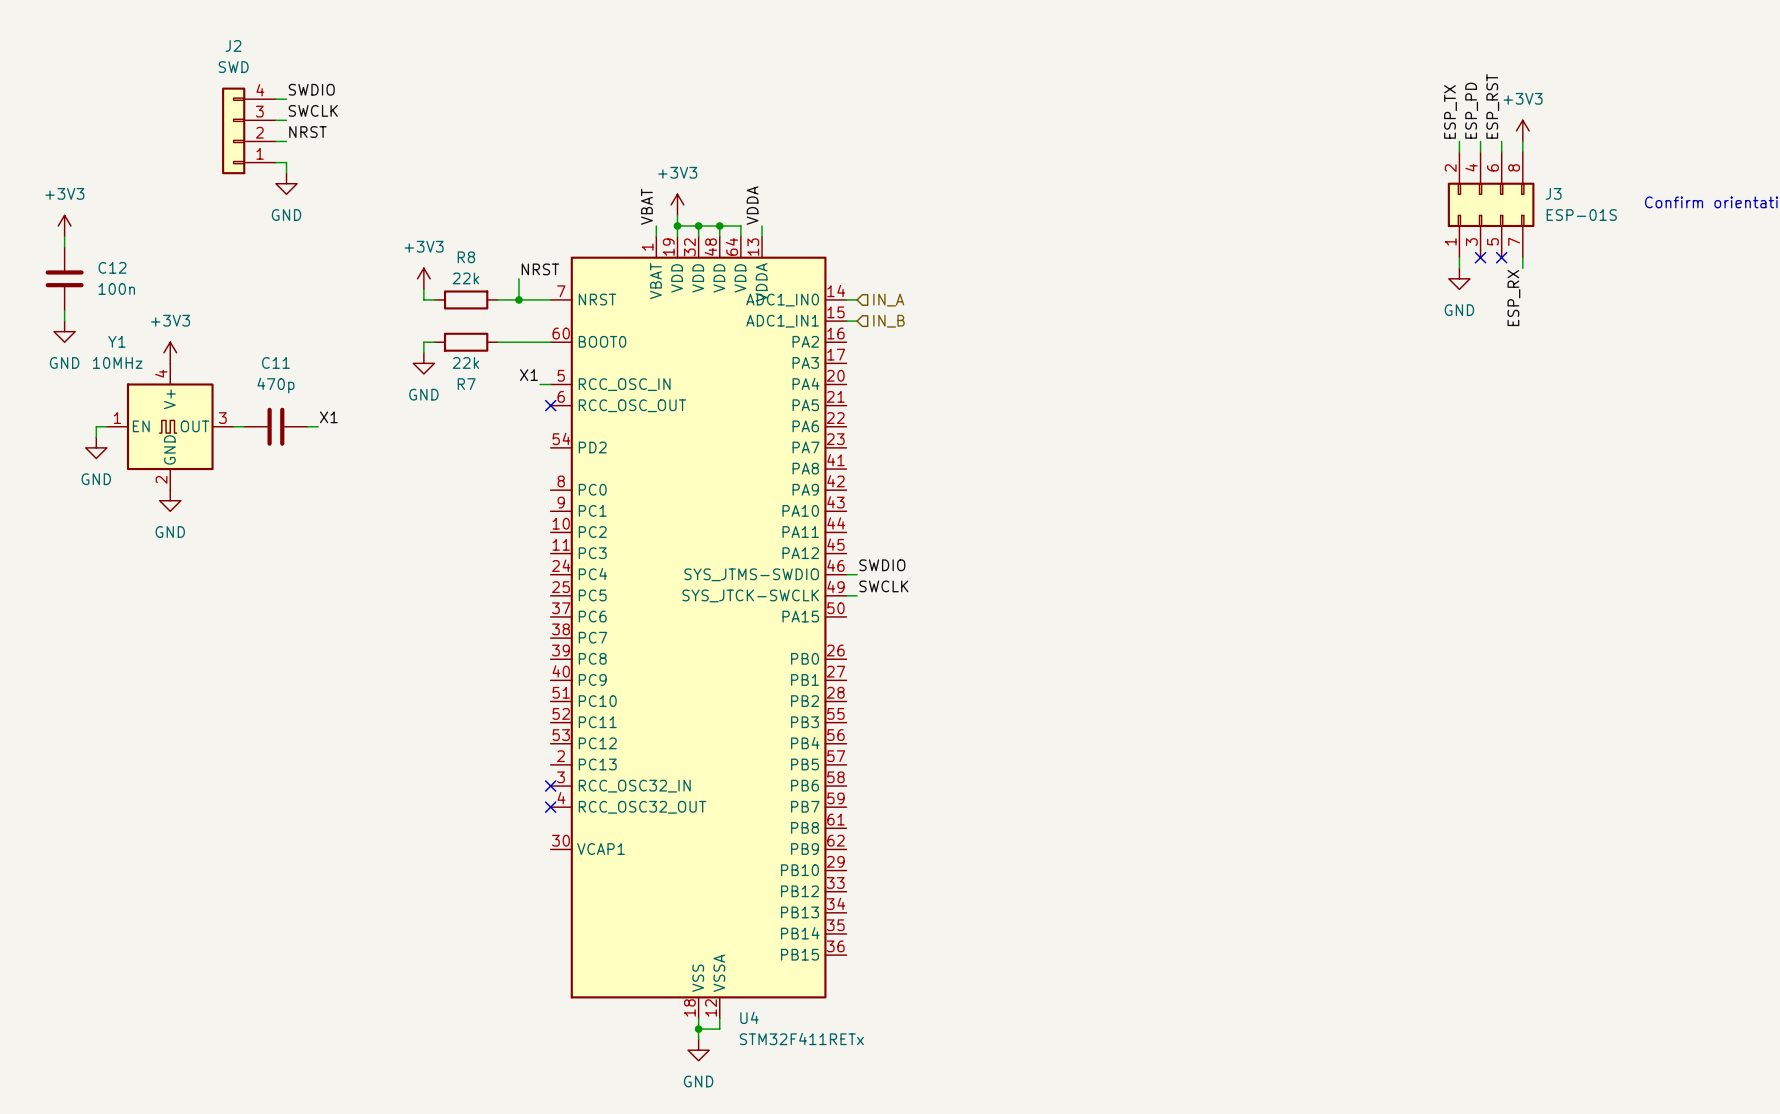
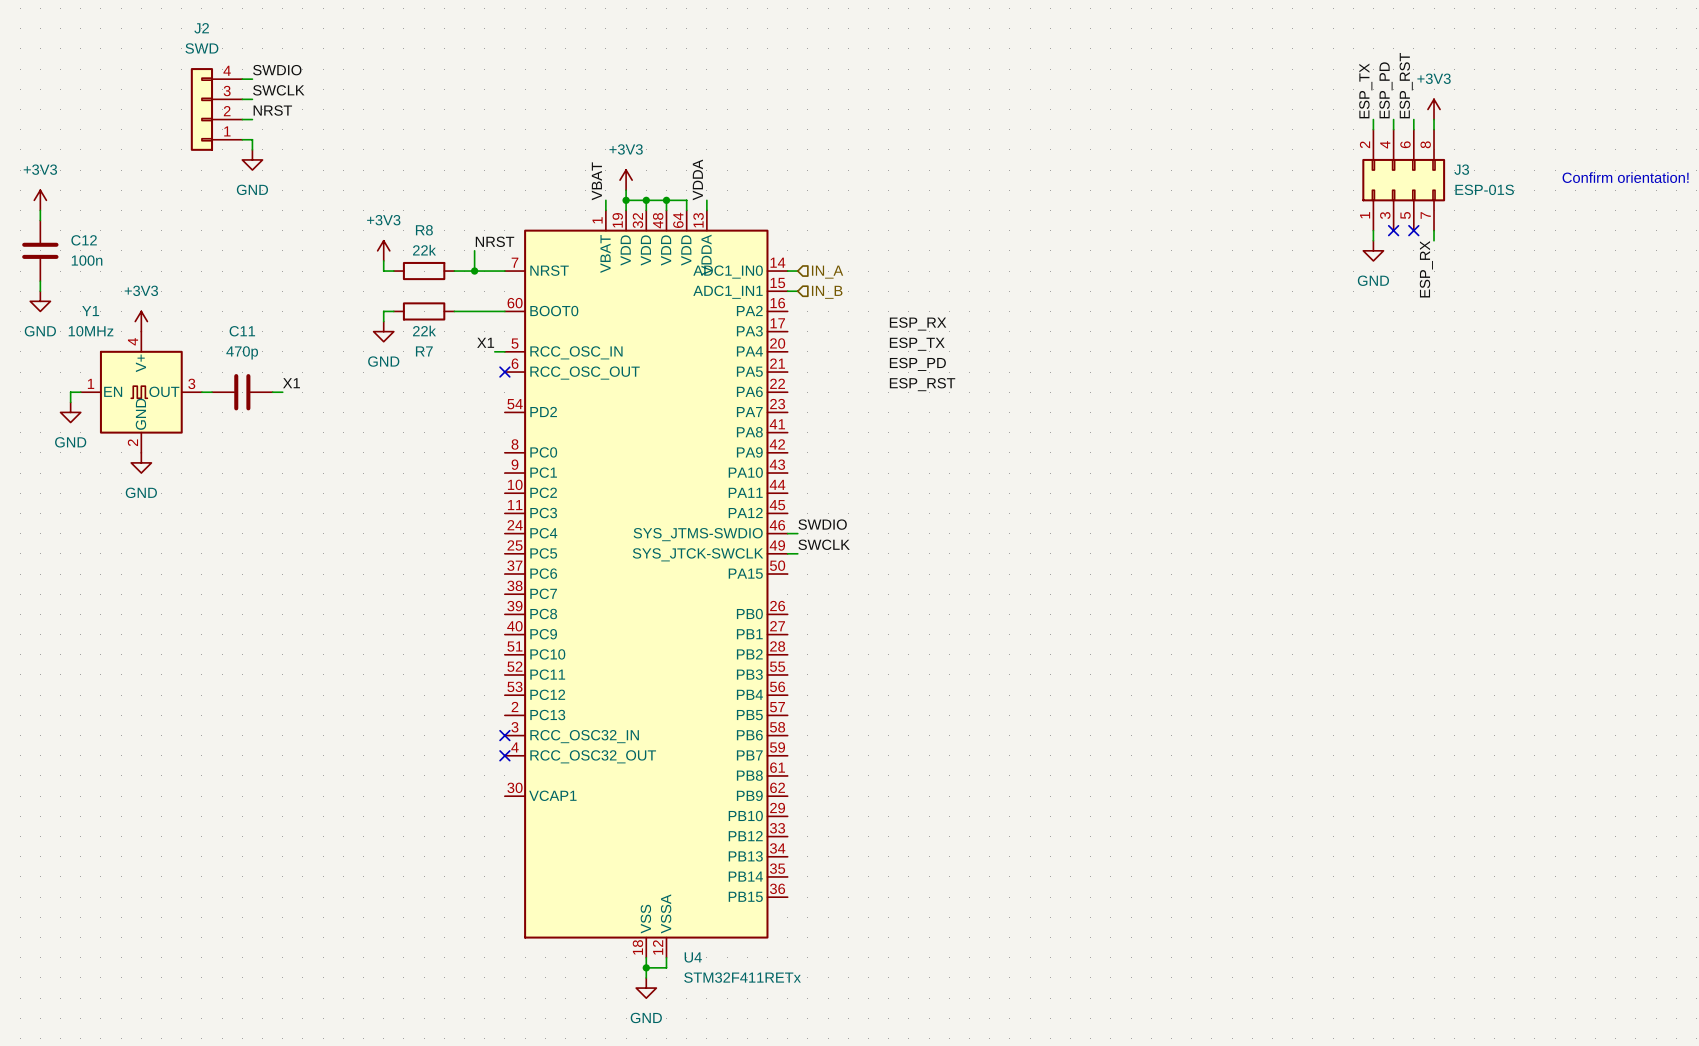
label: none -> ESP_RX (918, 324)
label: none -> ESP_TX (917, 344)
label: none -> ESP_PD (917, 364)
label: none -> ESP_RST (922, 384)

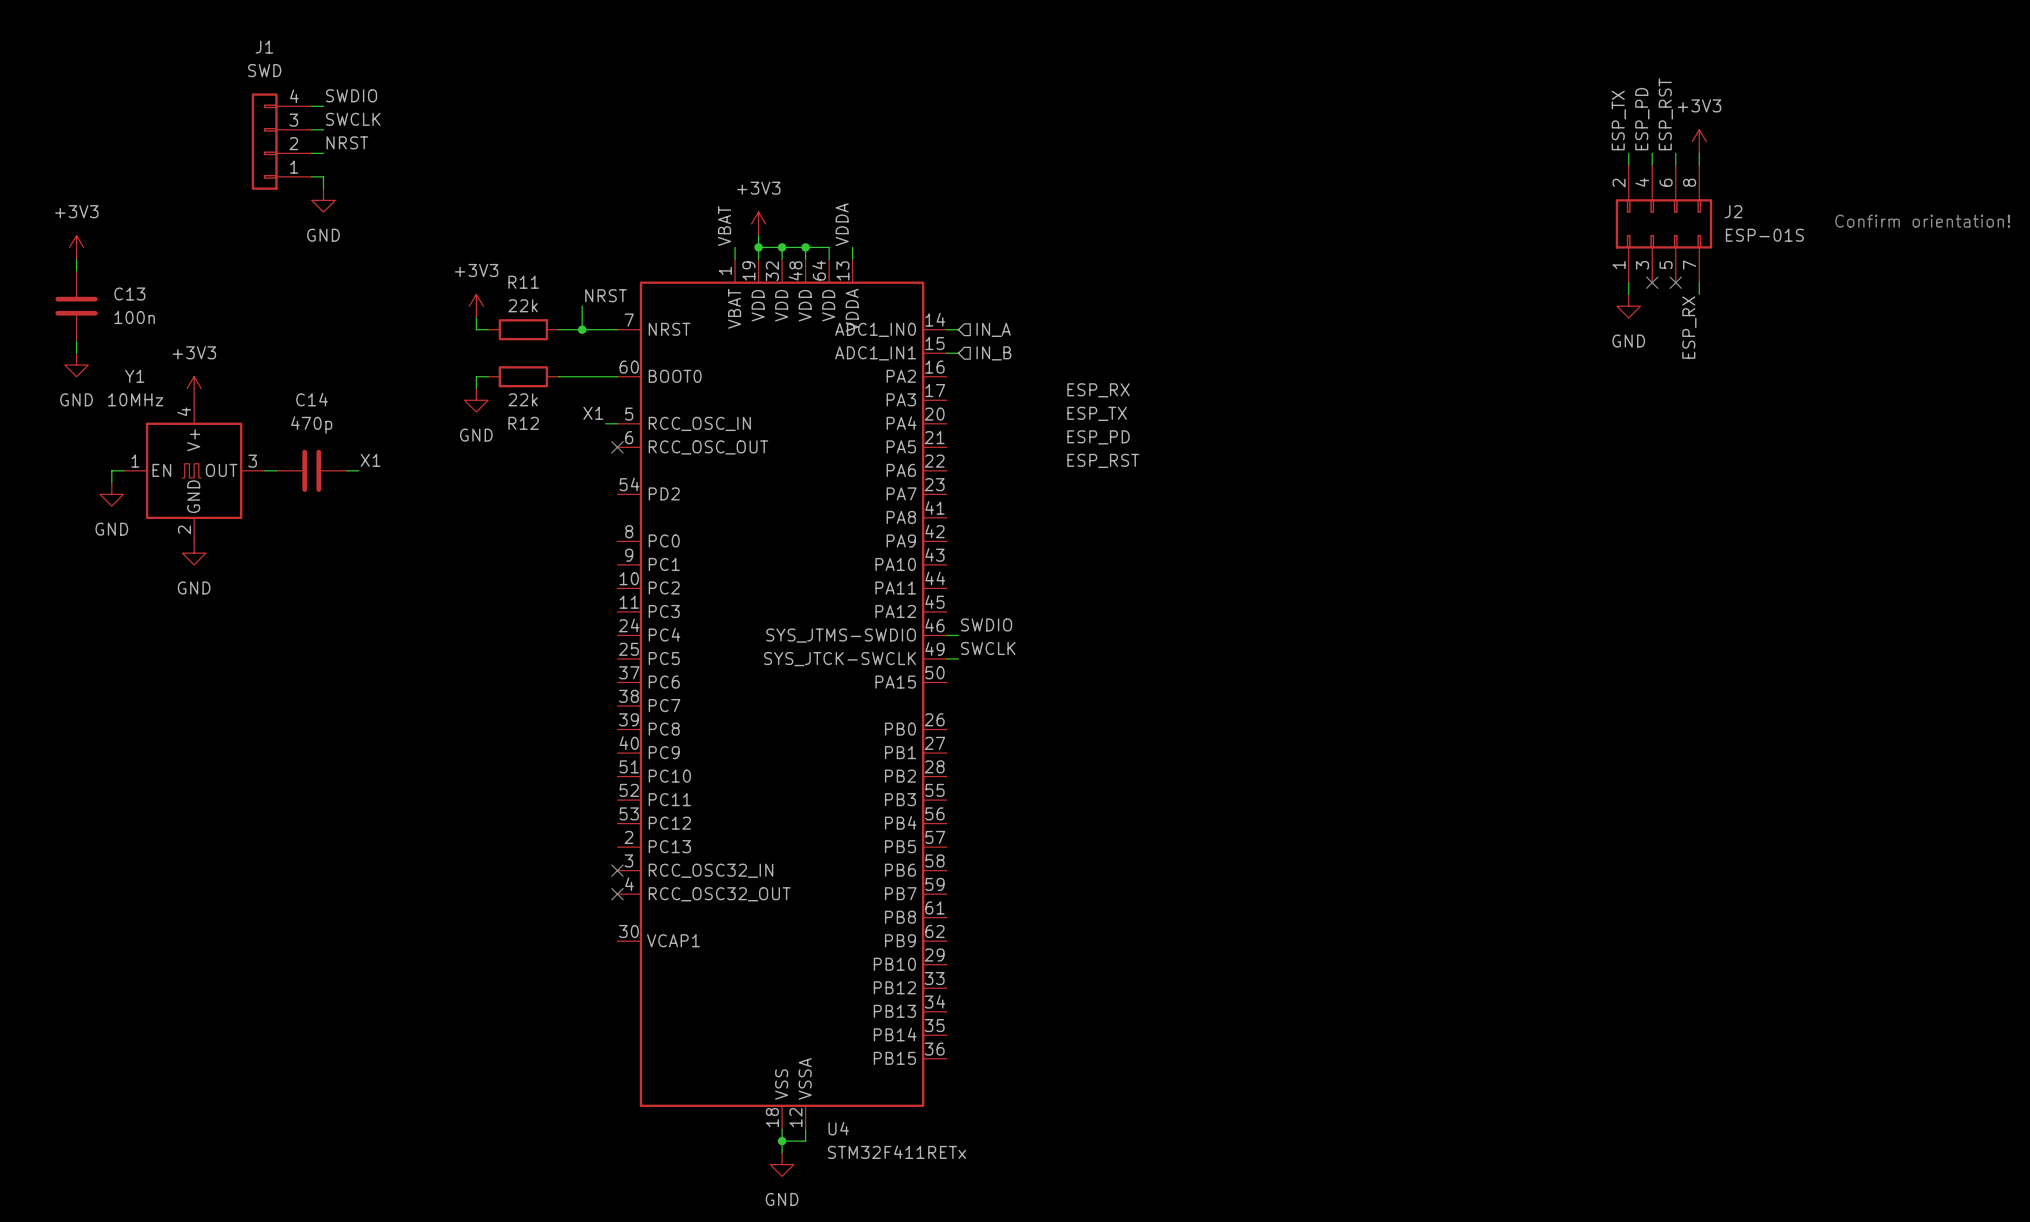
J2 name: J2 (201, 28) -> J1 (264, 47)
J3 name: J3 (1461, 169) -> J2 (1733, 211)
R8 name: R8 (424, 230) -> R11 (523, 282)
C12 name: C12 (84, 240) -> C13 (129, 294)
C11 name: C11 (242, 331) -> C14 (312, 399)
R7 name: R7 (424, 351) -> R12 (523, 423)

